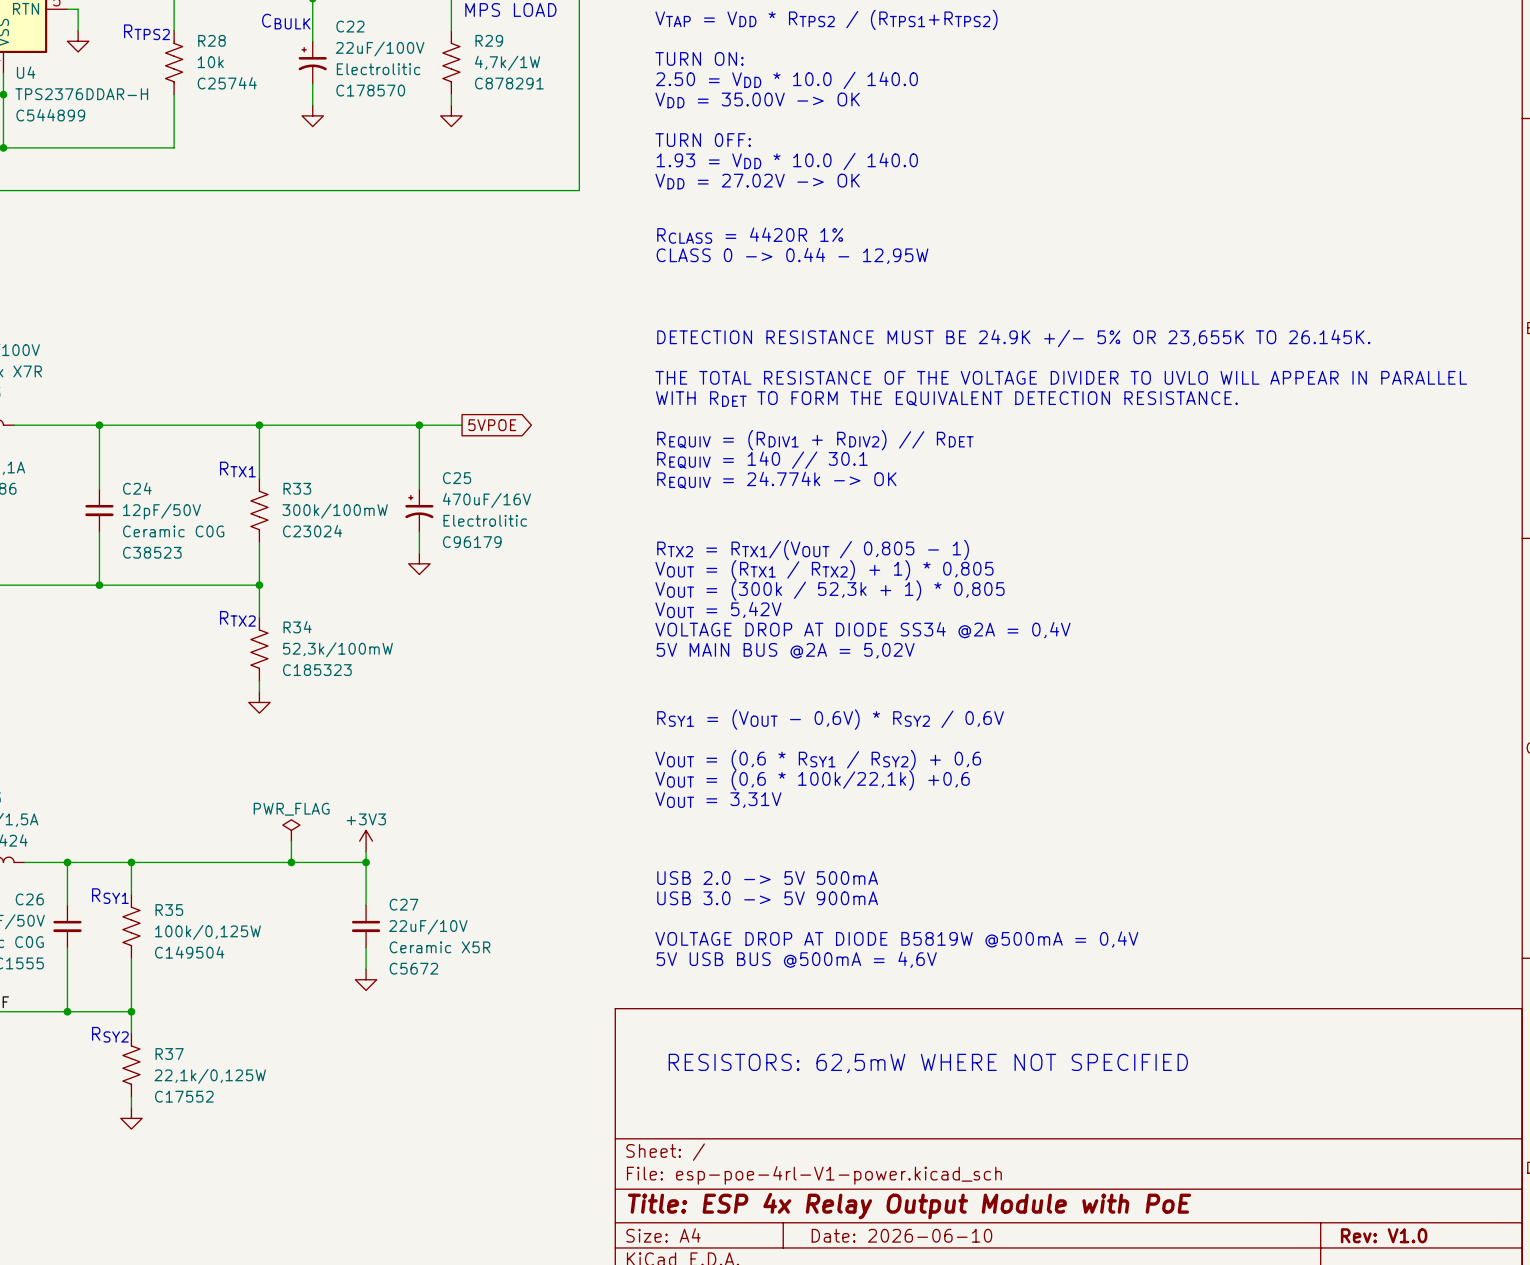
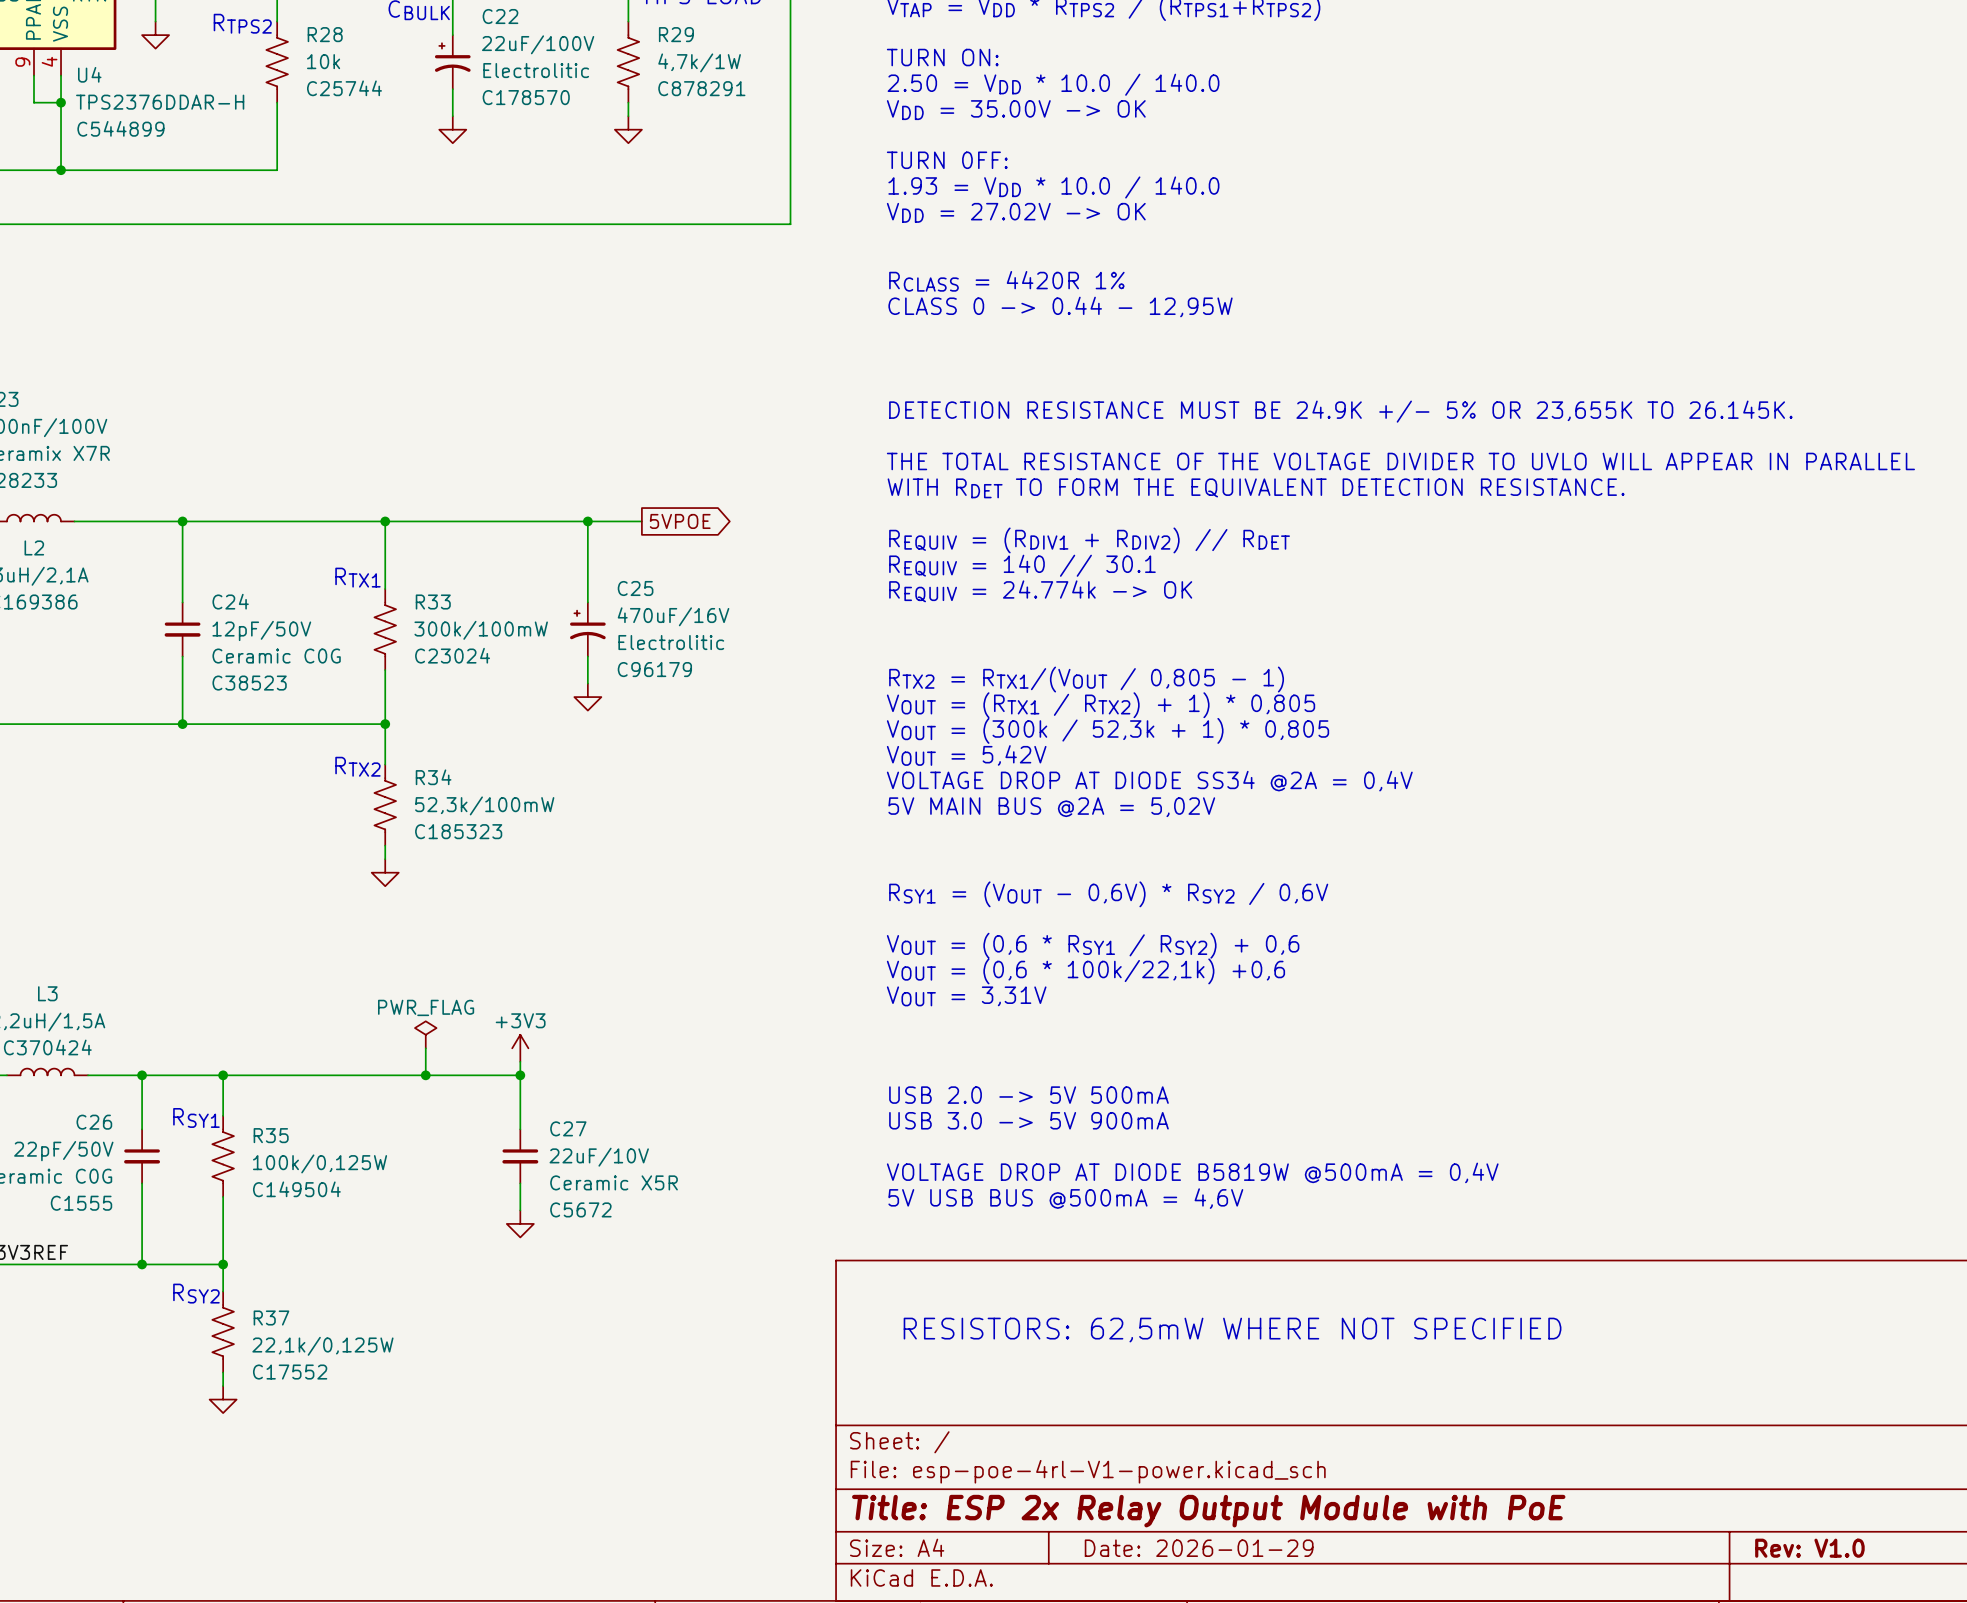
title block: Title: ESP 4x Relay Output Module with PoE (909, 1206) -> Title: ESP 2x Relay Output Module with PoE (1208, 1511)
title block: Date: 2026-06-10 (901, 1235) -> Date: 2026-01-29 (1199, 1548)

